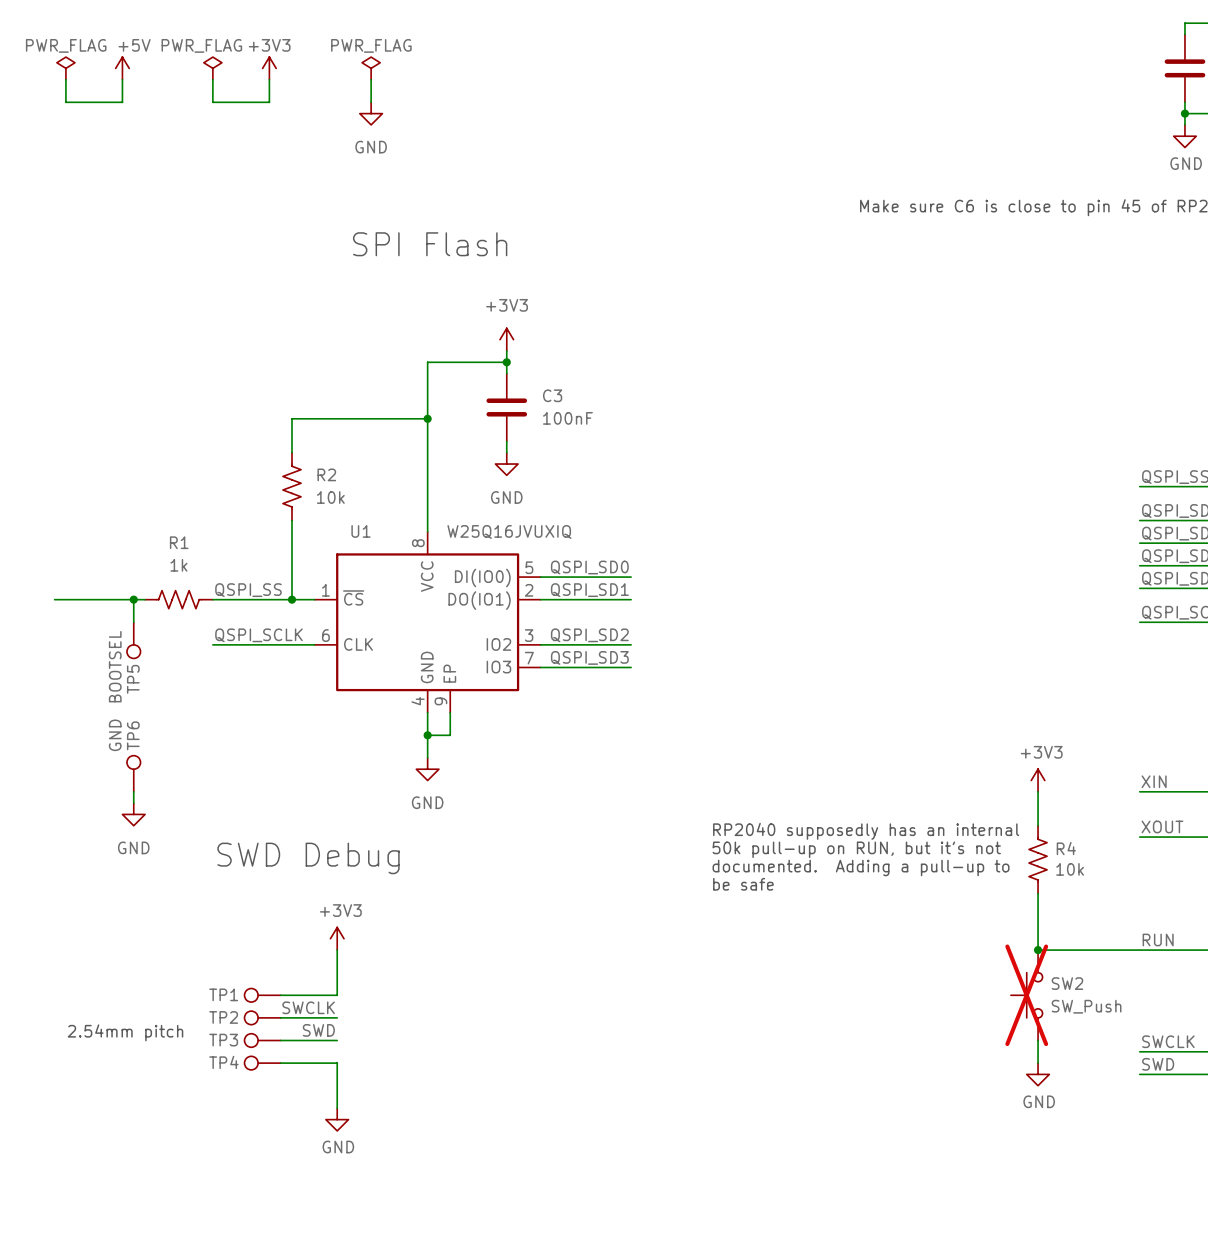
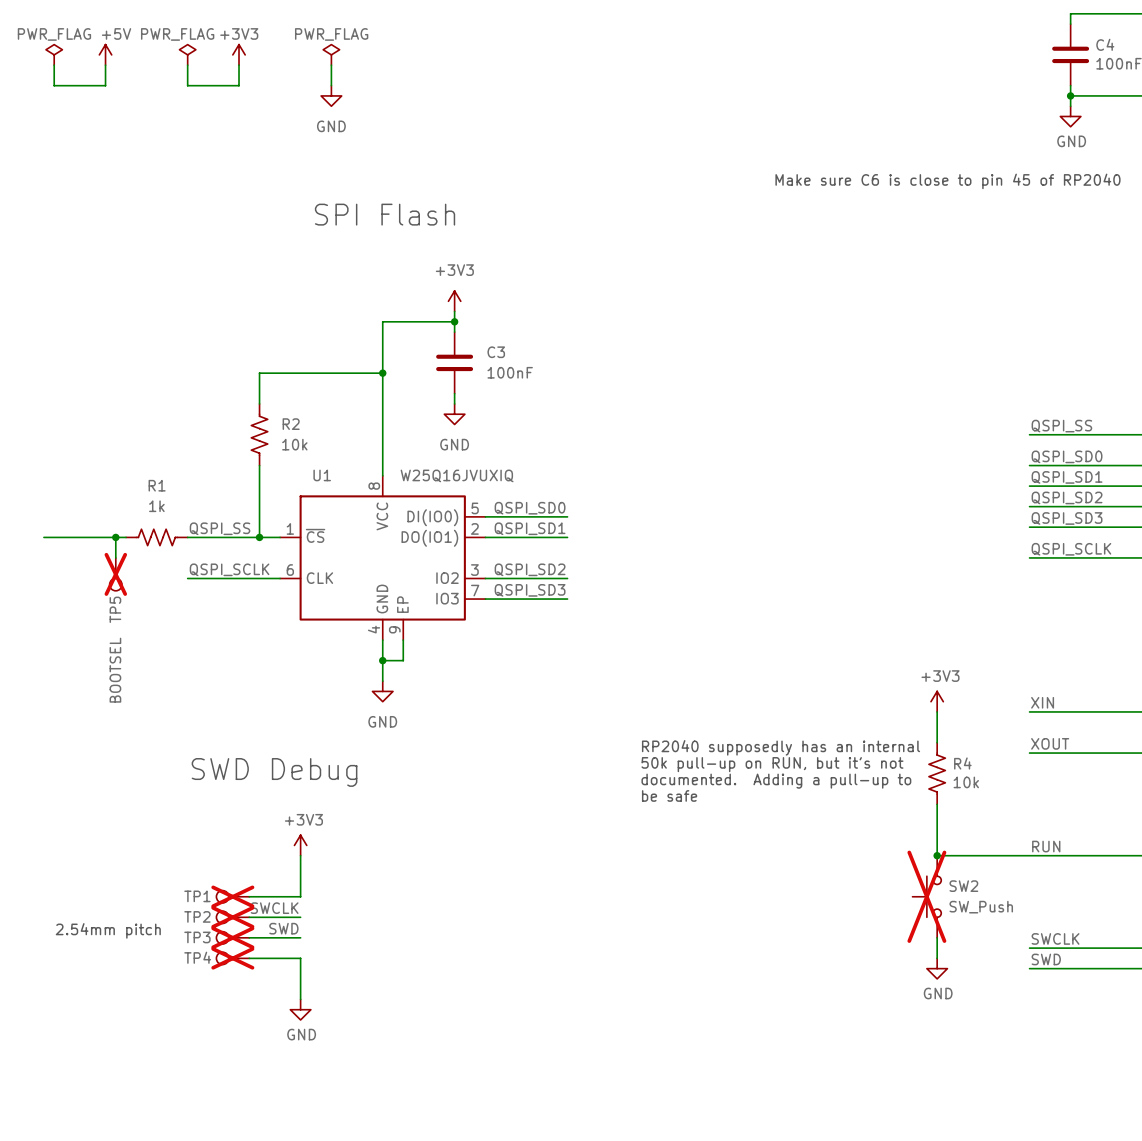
TP5 do-not-place cross: none -> (115, 574)
TP5 value position: BOOTSEL (115, 666) -> BOOTSEL (115, 670)
TP6: GND (133, 773) -> none
wire: (133, 791) (133, 803) -> none
power symbol: GND (133, 814) -> none
TP1 do-not-place cross: none -> (232, 896)
TP2 do-not-place cross: none -> (232, 917)
TP3 do-not-place cross: none -> (232, 937)
TP4 do-not-place cross: none -> (232, 958)

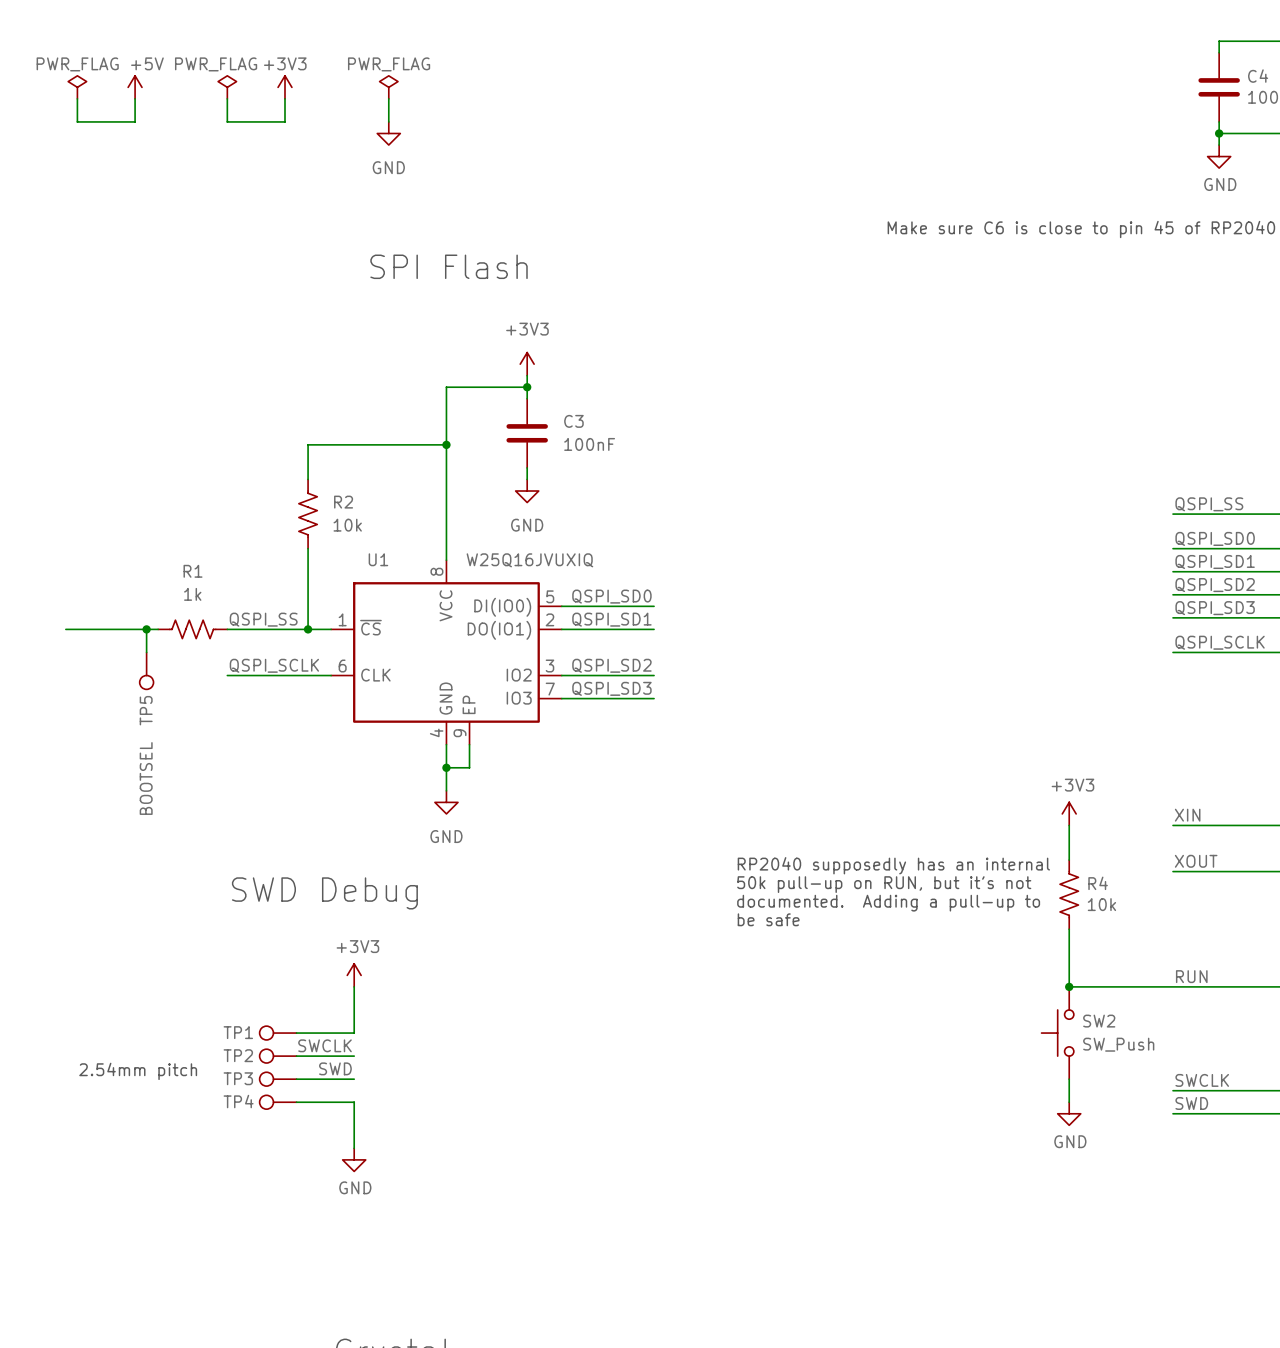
TP5 do-not-place cross: (115, 574) -> none
TP1 do-not-place cross: (232, 896) -> none
SW2 do-not-place cross: (926, 896) -> none
TP2 do-not-place cross: (232, 917) -> none
TP3 do-not-place cross: (232, 937) -> none
TP4 do-not-place cross: (232, 958) -> none

